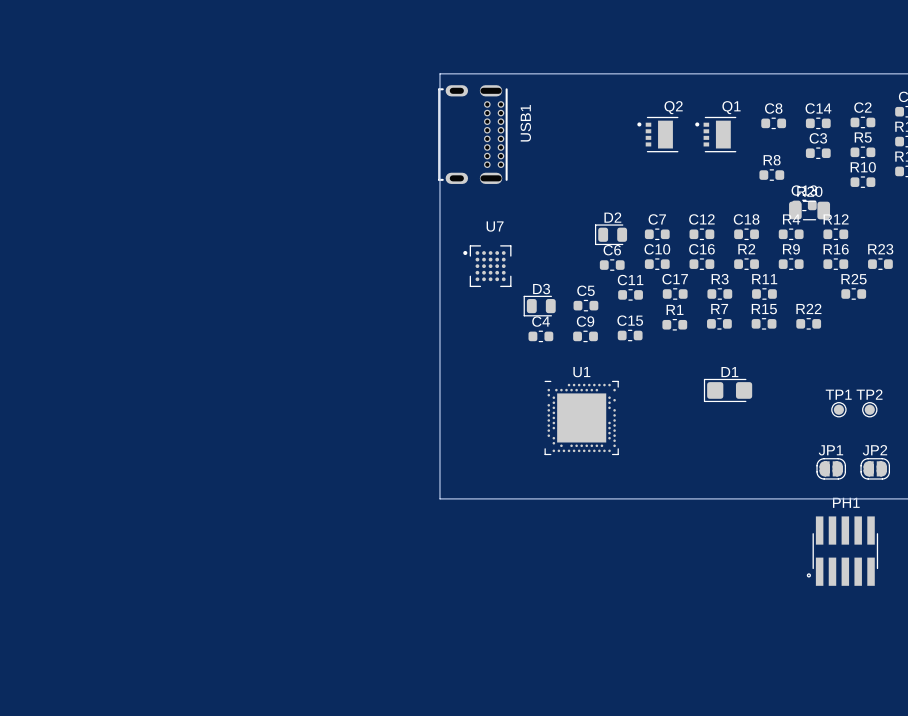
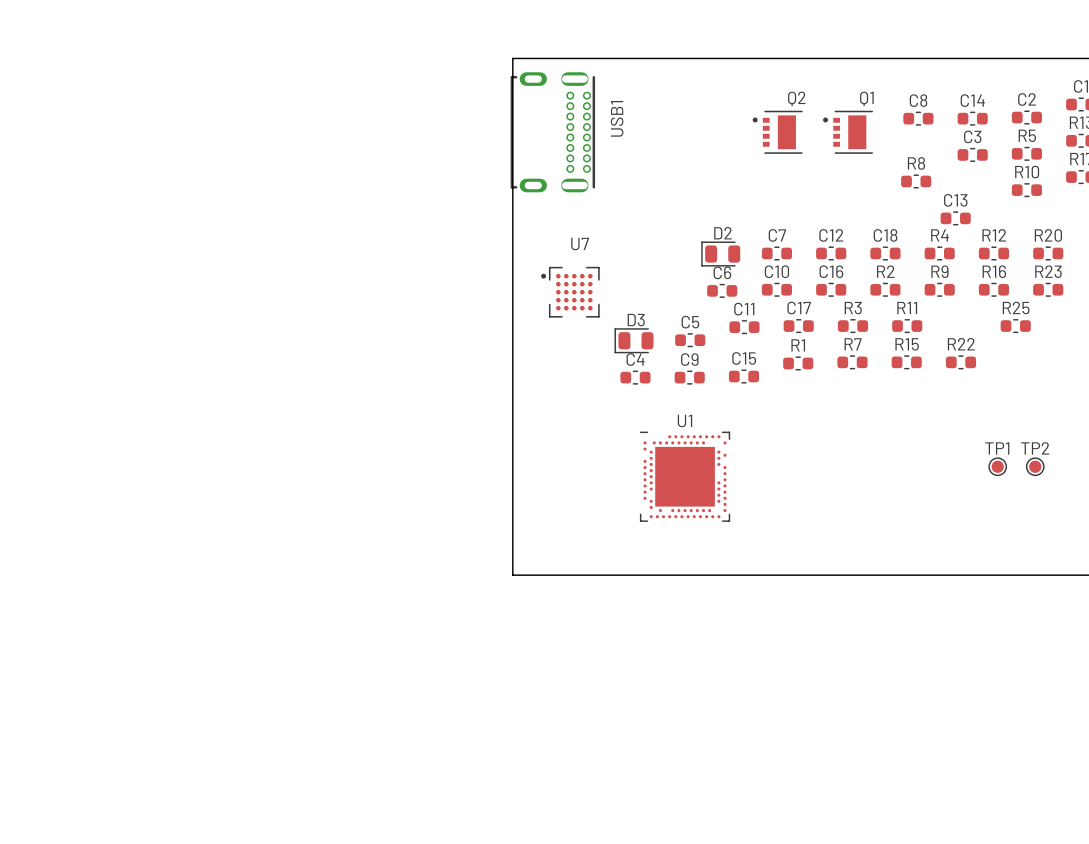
R20 footprint: [789, 200, 831, 221] -> [1033, 246, 1064, 261]
D1: (728, 390) -> none
JP1: (831, 468) -> none
JP2: (875, 468) -> none
PH1: (842, 551) -> none

